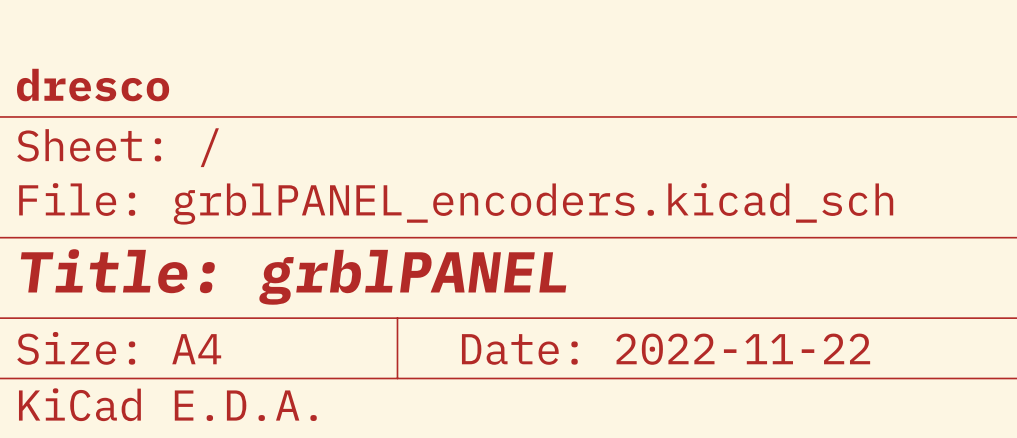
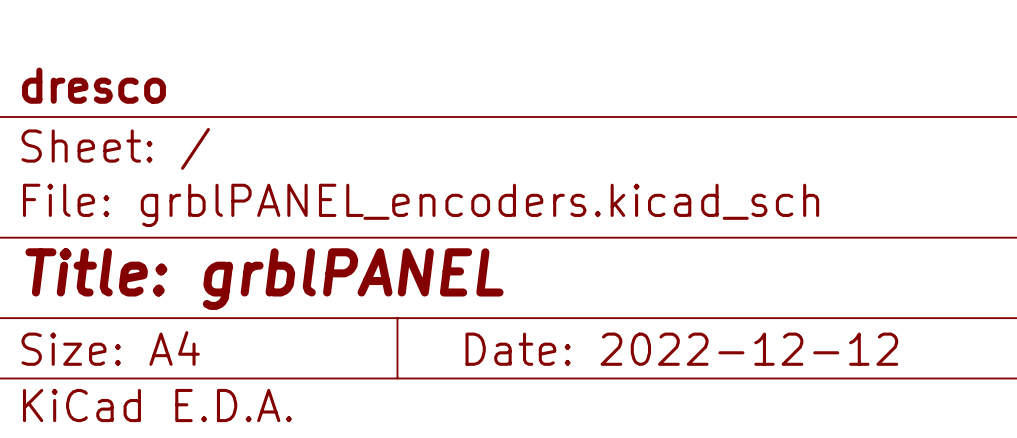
title block: Date: 2022-11-22 (666, 349) -> Date: 2022-12-12 (681, 349)

